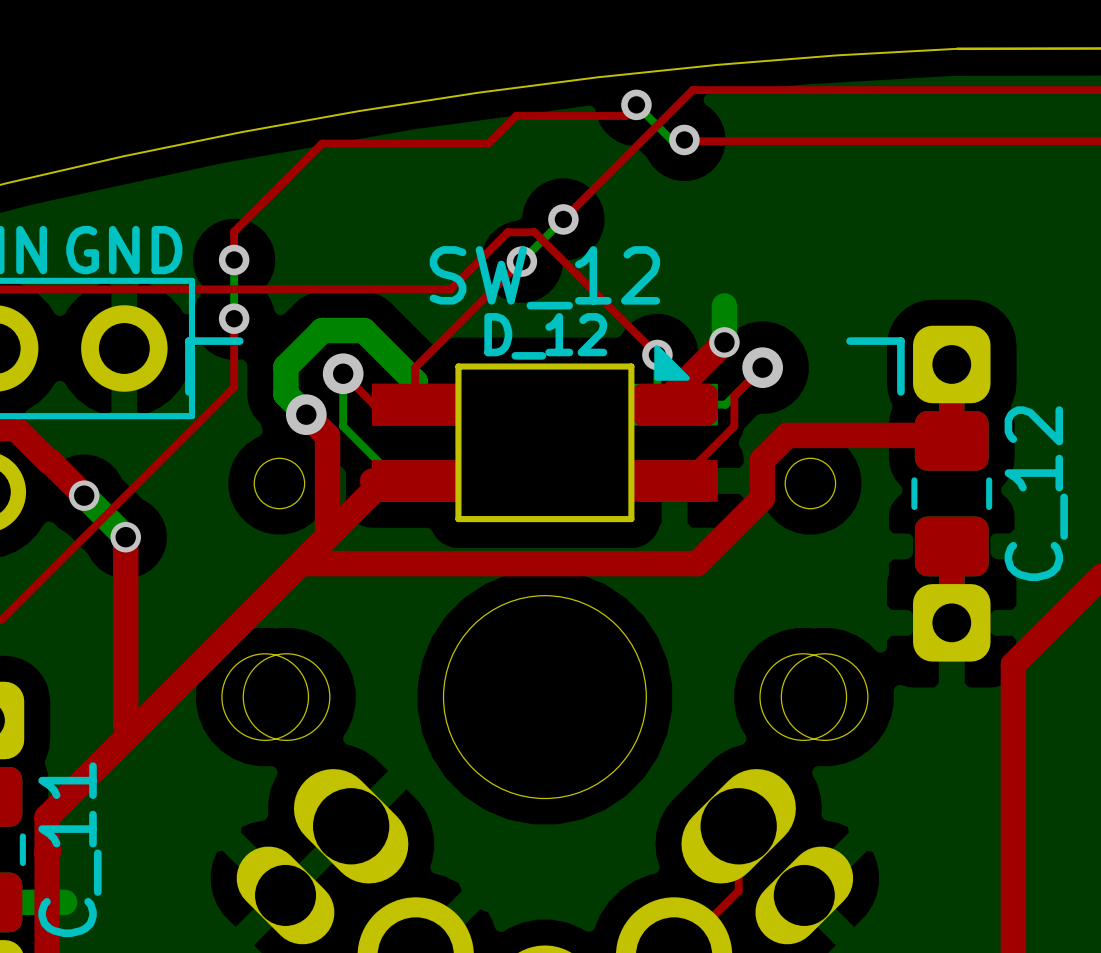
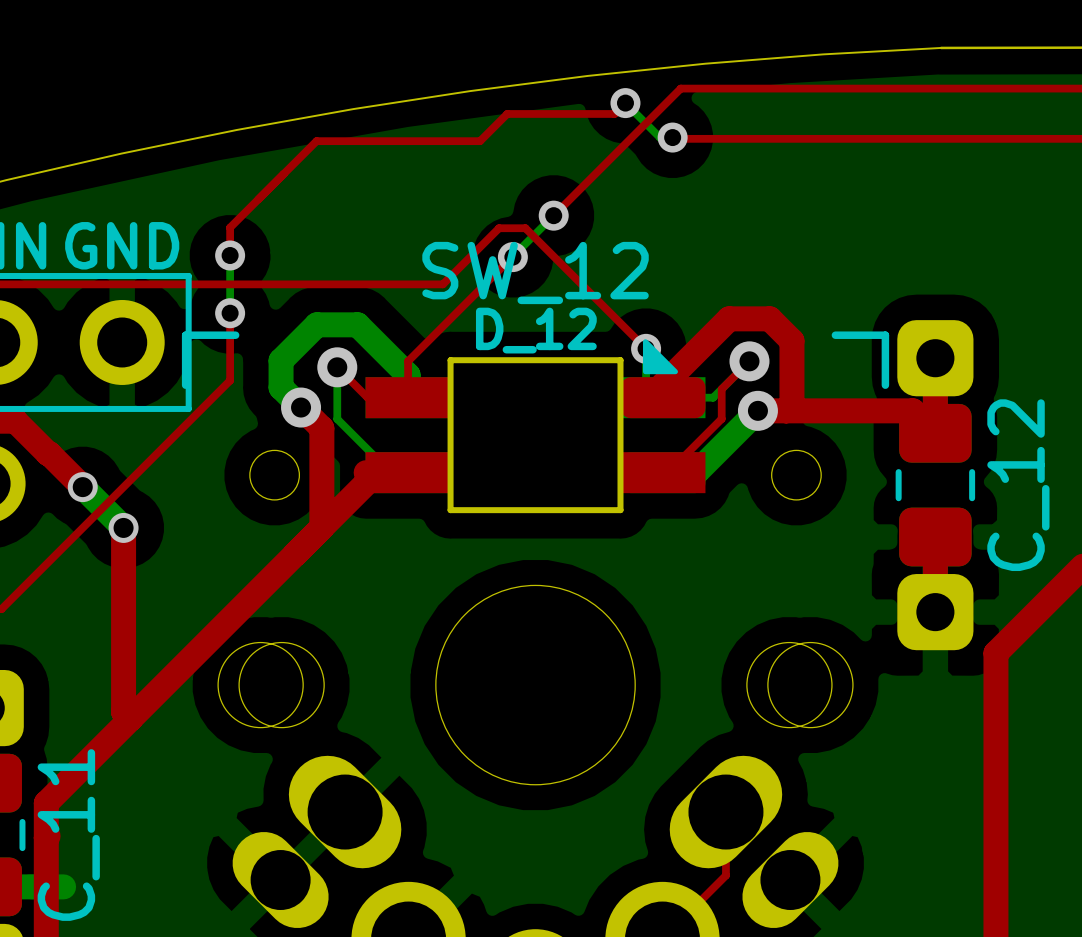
bottom track: (724, 305) (724, 342) -> none
top track: none -> (711, 336) (729, 318) (769, 318) (791, 340) (791, 405) (786, 410)
via: (724, 342) -> none
bottom track: none -> (757, 410) (696, 472) (662, 472)
via: none -> (757, 410)
top track: (946, 435) (787, 435) (762, 460) (762, 498) (697, 563) (300, 563) -> (929, 427) (912, 410) (757, 410)

